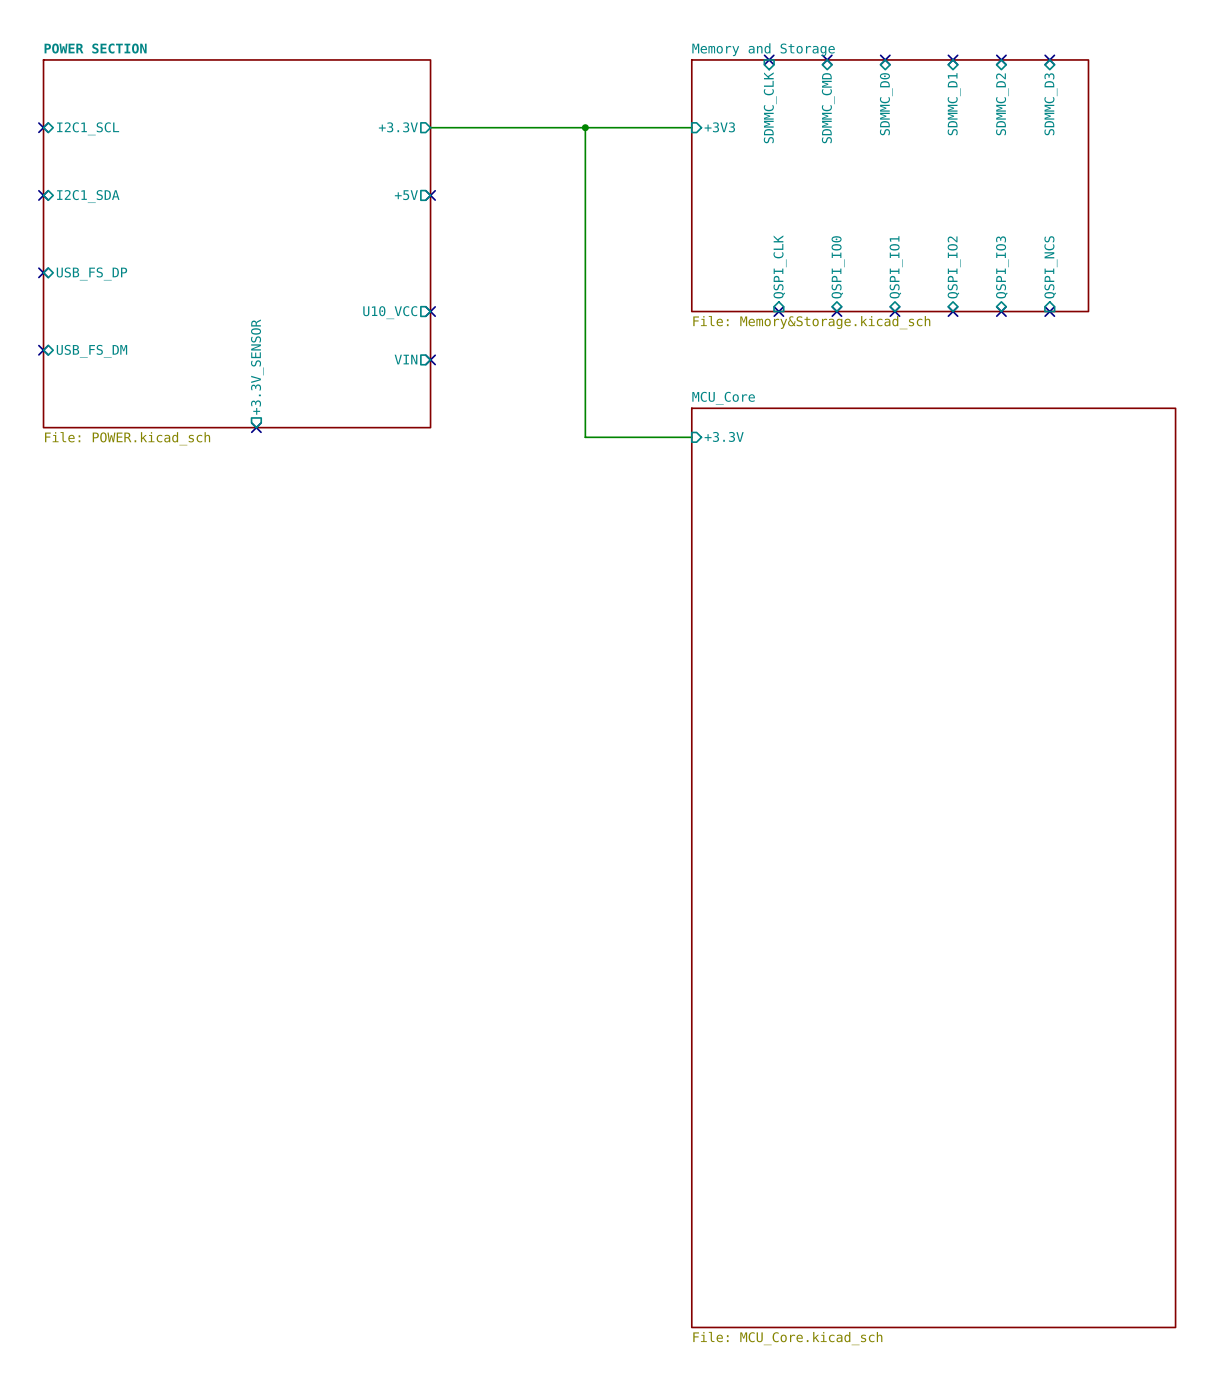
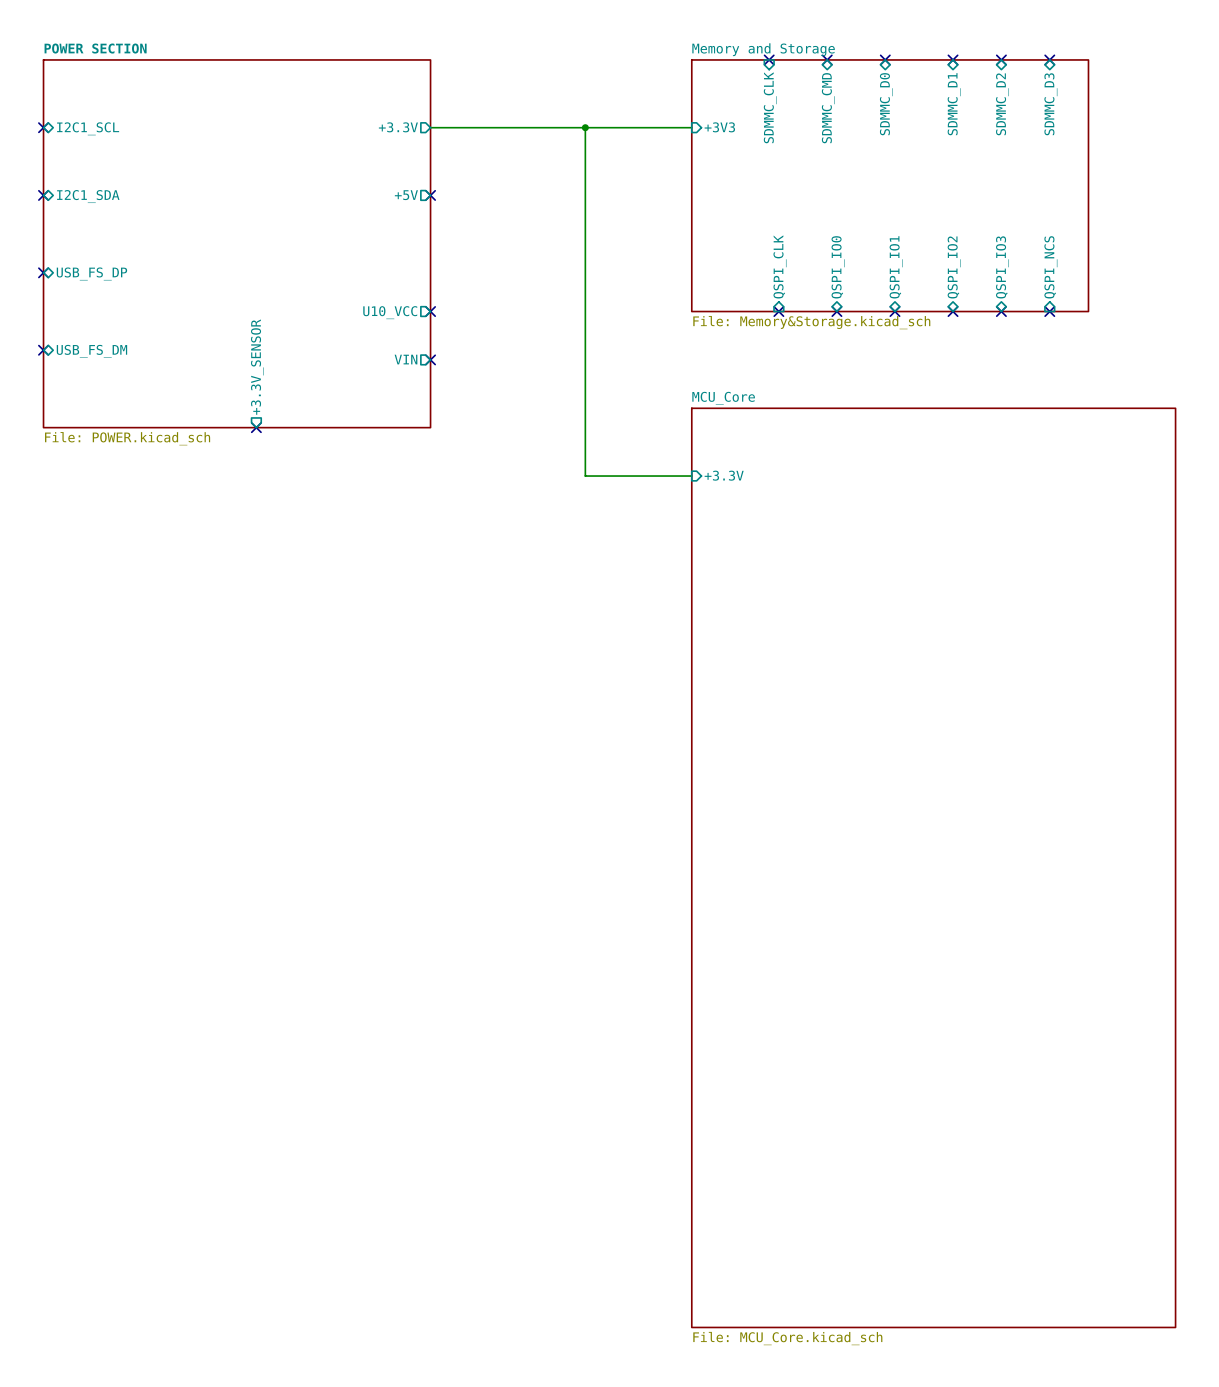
sheet pin position: +3.3V (724, 436) -> +3.3V (724, 475)
wire: (585, 437) (691, 437) -> (585, 437) (585, 476) (691, 476)

